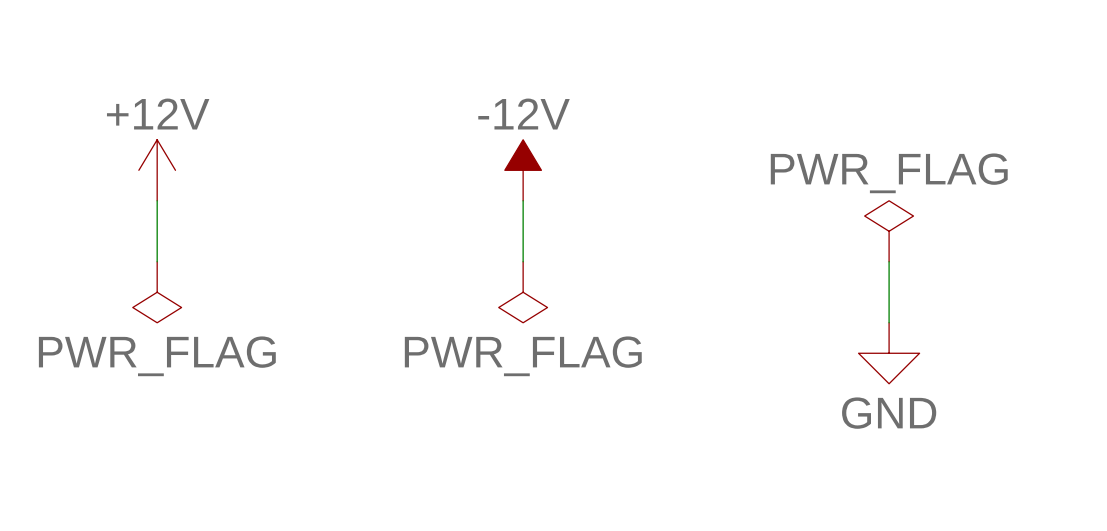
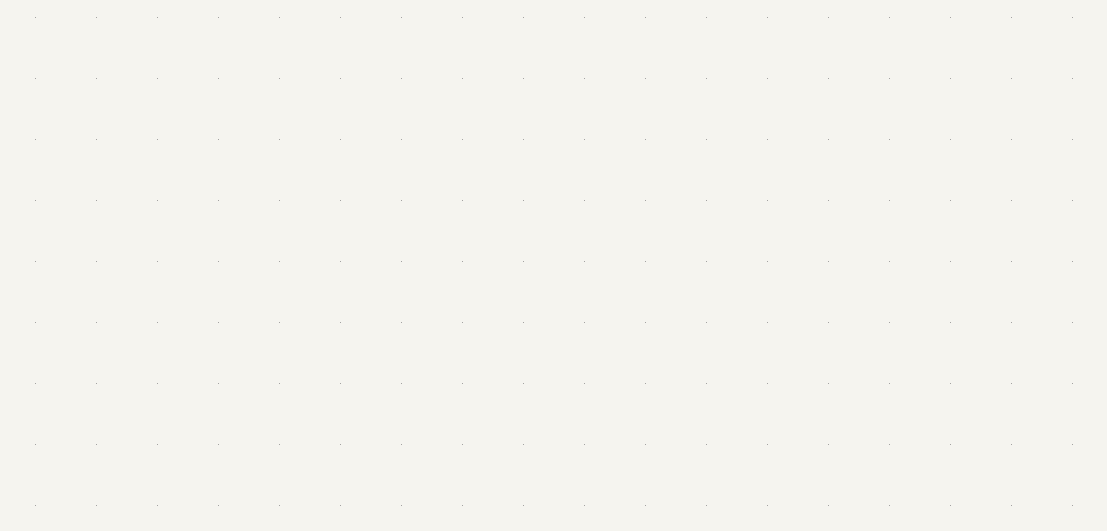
power symbol: +12V (157, 170) -> none
power symbol: -12V (523, 170) -> none
wire: (157, 200) (157, 261) -> none
wire: (523, 200) (523, 261) -> none
power symbol: PWR_FLAG (889, 231) -> none
wire: (889, 261) (889, 322) -> none
power symbol: PWR_FLAG (157, 292) -> none
power symbol: PWR_FLAG (523, 292) -> none
power symbol: GND (889, 353) -> none

